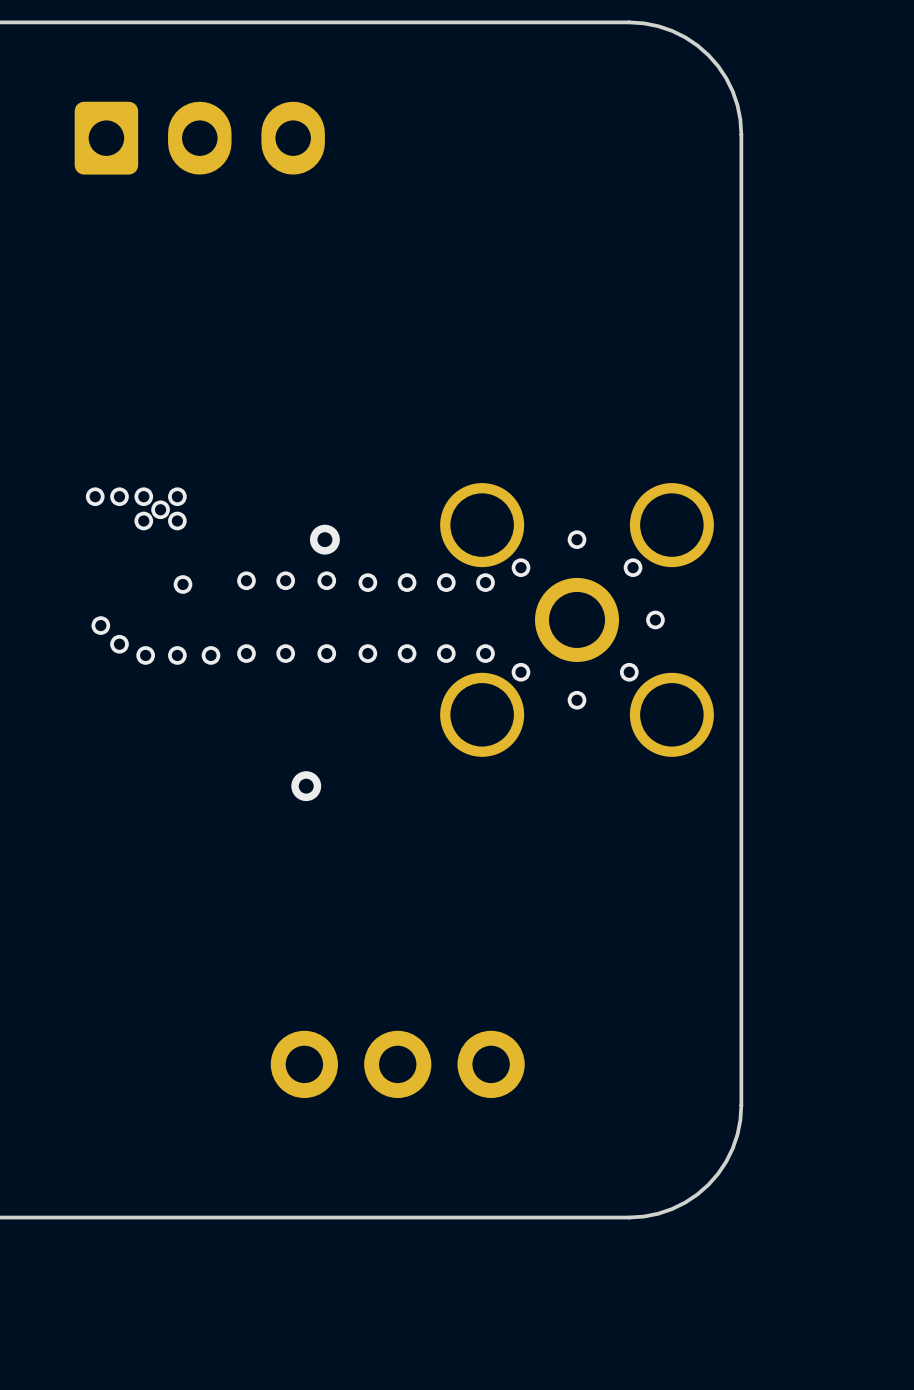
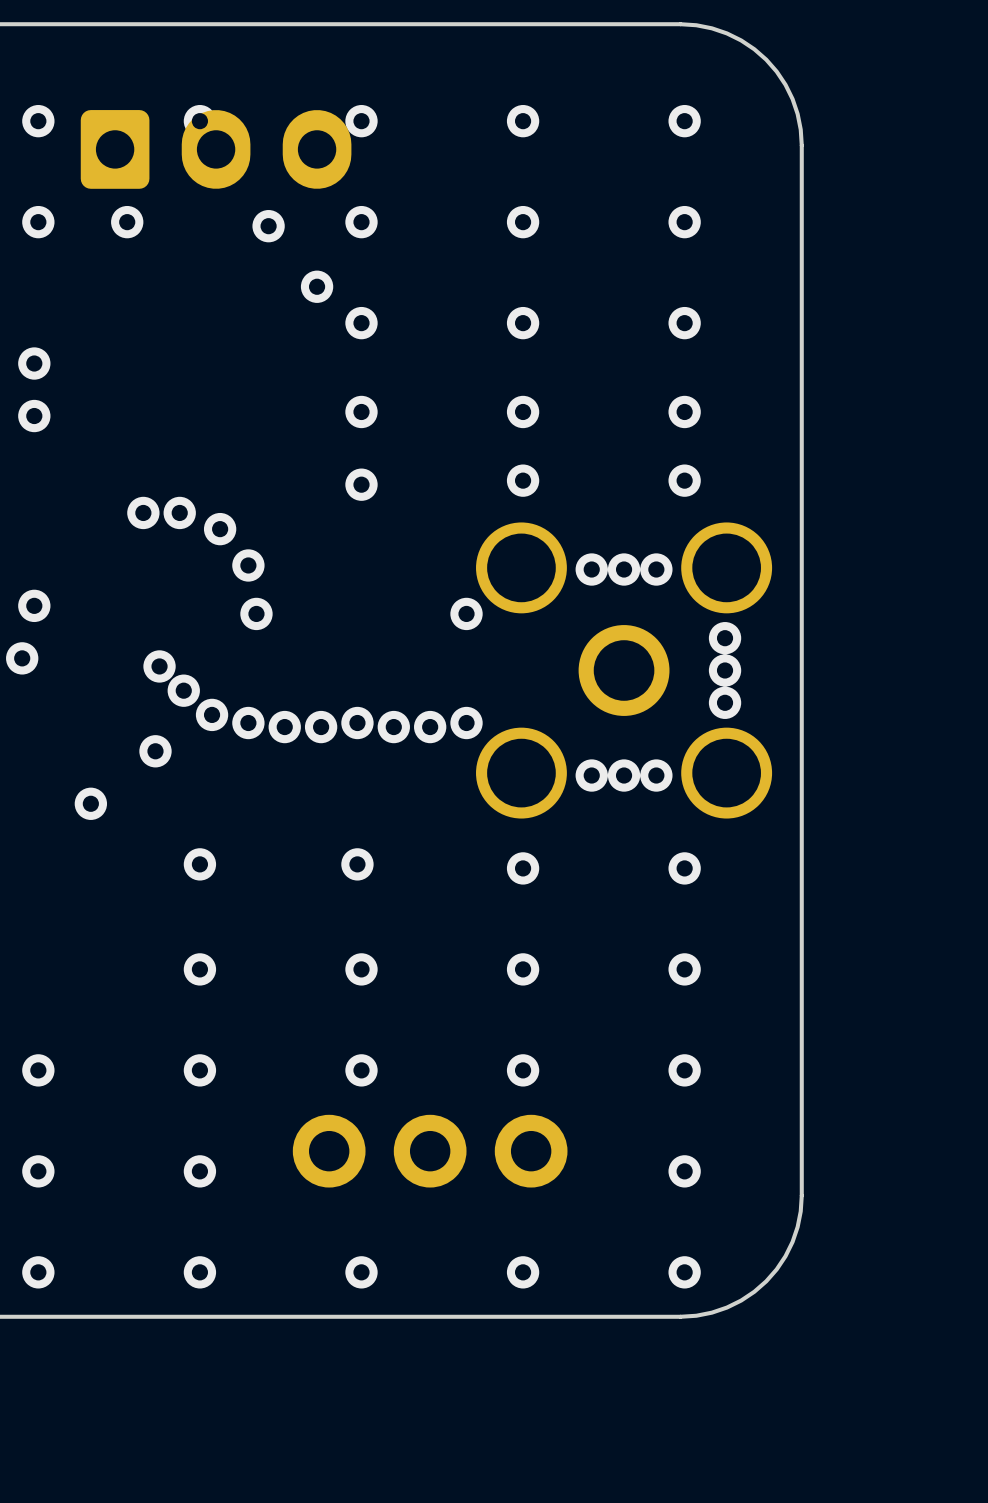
via: none -> (38, 121)
via: none -> (199, 121)
via: none -> (361, 121)
via: none -> (523, 121)
via: none -> (684, 121)
via: none -> (38, 222)
via: none -> (127, 222)
via: none -> (361, 222)
via: none -> (523, 222)
via: none -> (684, 222)
via: none -> (268, 226)
via: none -> (317, 286)
via: none -> (361, 323)
via: none -> (523, 323)
via: none -> (684, 323)
via: none -> (34, 363)
via: none -> (361, 411)
via: none -> (523, 411)
via: none -> (684, 411)
via: none -> (34, 416)
via: none -> (523, 480)
via: none -> (684, 480)
via: none -> (361, 484)
via: none -> (143, 512)
via: none -> (179, 512)
via: none -> (220, 529)
via: (95, 496) -> none
via: (119, 496) -> none
via: (143, 496) -> none
via: (177, 496) -> none
via: (160, 509) -> none
via: (143, 520) -> none
via: (177, 520) -> none
via: none -> (248, 565)
via: none -> (591, 569)
via: none -> (656, 569)
via size: [567, 530, 587, 550] -> [607, 553, 641, 586]
via: (324, 539) -> none
via: none -> (34, 605)
via: none -> (466, 613)
via: (520, 567) -> none
via: (633, 567) -> none
via size: [237, 571, 256, 591] -> [240, 597, 273, 631]
via: (285, 580) -> none
via: (326, 580) -> none
via: (367, 582) -> none
via: (407, 582) -> none
via: (446, 582) -> none
via: (485, 582) -> none
via: (182, 584) -> none
via: none -> (725, 638)
via: none -> (22, 658)
via size: [646, 610, 665, 630] -> [708, 654, 742, 687]
via: none -> (159, 666)
via: (100, 625) -> none
via: none -> (183, 690)
via: (119, 644) -> none
via size: [317, 644, 337, 663] -> [341, 706, 374, 740]
via size: [358, 644, 378, 663] -> [377, 710, 410, 744]
via: none -> (725, 702)
via: (246, 653) -> none
via: (285, 653) -> none
via: (407, 653) -> none
via: (446, 653) -> none
via: (485, 653) -> none
via: (145, 655) -> none
via: (177, 655) -> none
via: (211, 655) -> none
via: none -> (212, 714)
via: none -> (248, 723)
via: none -> (466, 723)
via: none -> (284, 727)
via: none -> (321, 727)
via: none -> (430, 727)
via: (520, 672) -> none
via: (629, 672) -> none
via size: [567, 690, 587, 710] -> [607, 759, 641, 792]
via: none -> (155, 751)
via: none -> (591, 775)
via: none -> (656, 775)
via: none -> (90, 803)
via position: (306, 786) -> (357, 864)
via: none -> (199, 864)
via: none -> (523, 868)
via: none -> (684, 868)
via: none -> (199, 969)
via: none -> (361, 969)
via: none -> (523, 969)
via: none -> (684, 969)
via: none -> (38, 1070)
via: none -> (199, 1070)
via: none -> (361, 1070)
via: none -> (523, 1070)
via: none -> (684, 1070)
via: none -> (38, 1171)
via: none -> (199, 1171)
via: none -> (684, 1171)
via: none -> (38, 1272)
via: none -> (199, 1272)
via: none -> (361, 1272)
via: none -> (523, 1272)
via: none -> (684, 1272)

